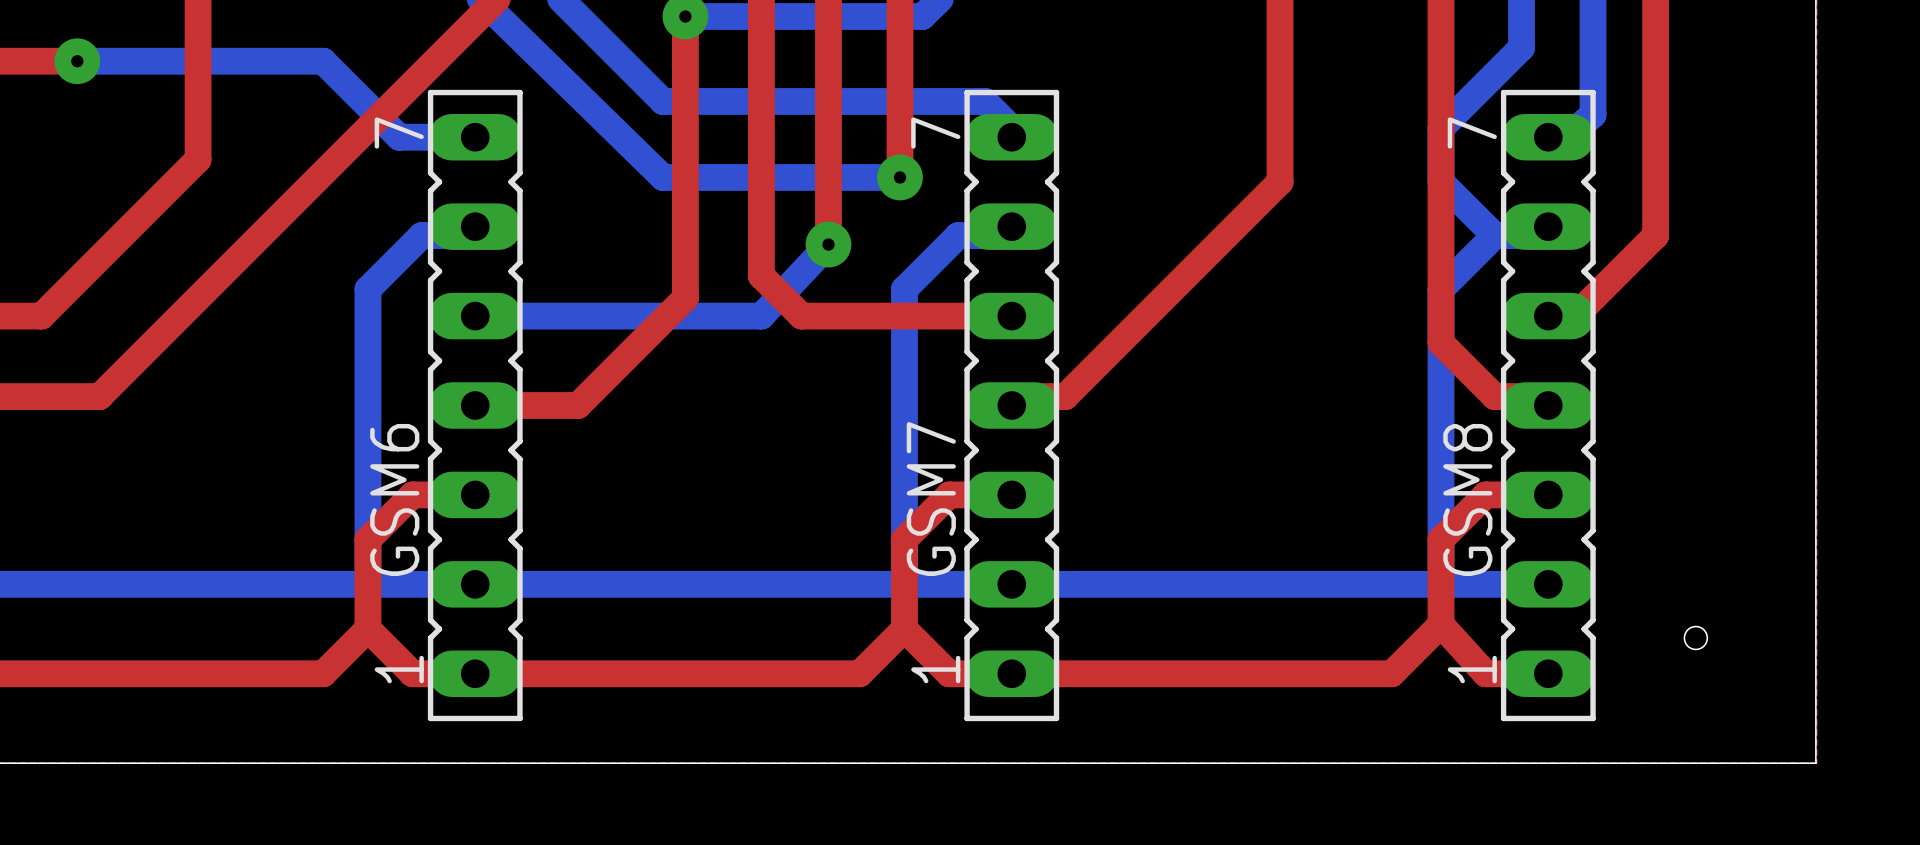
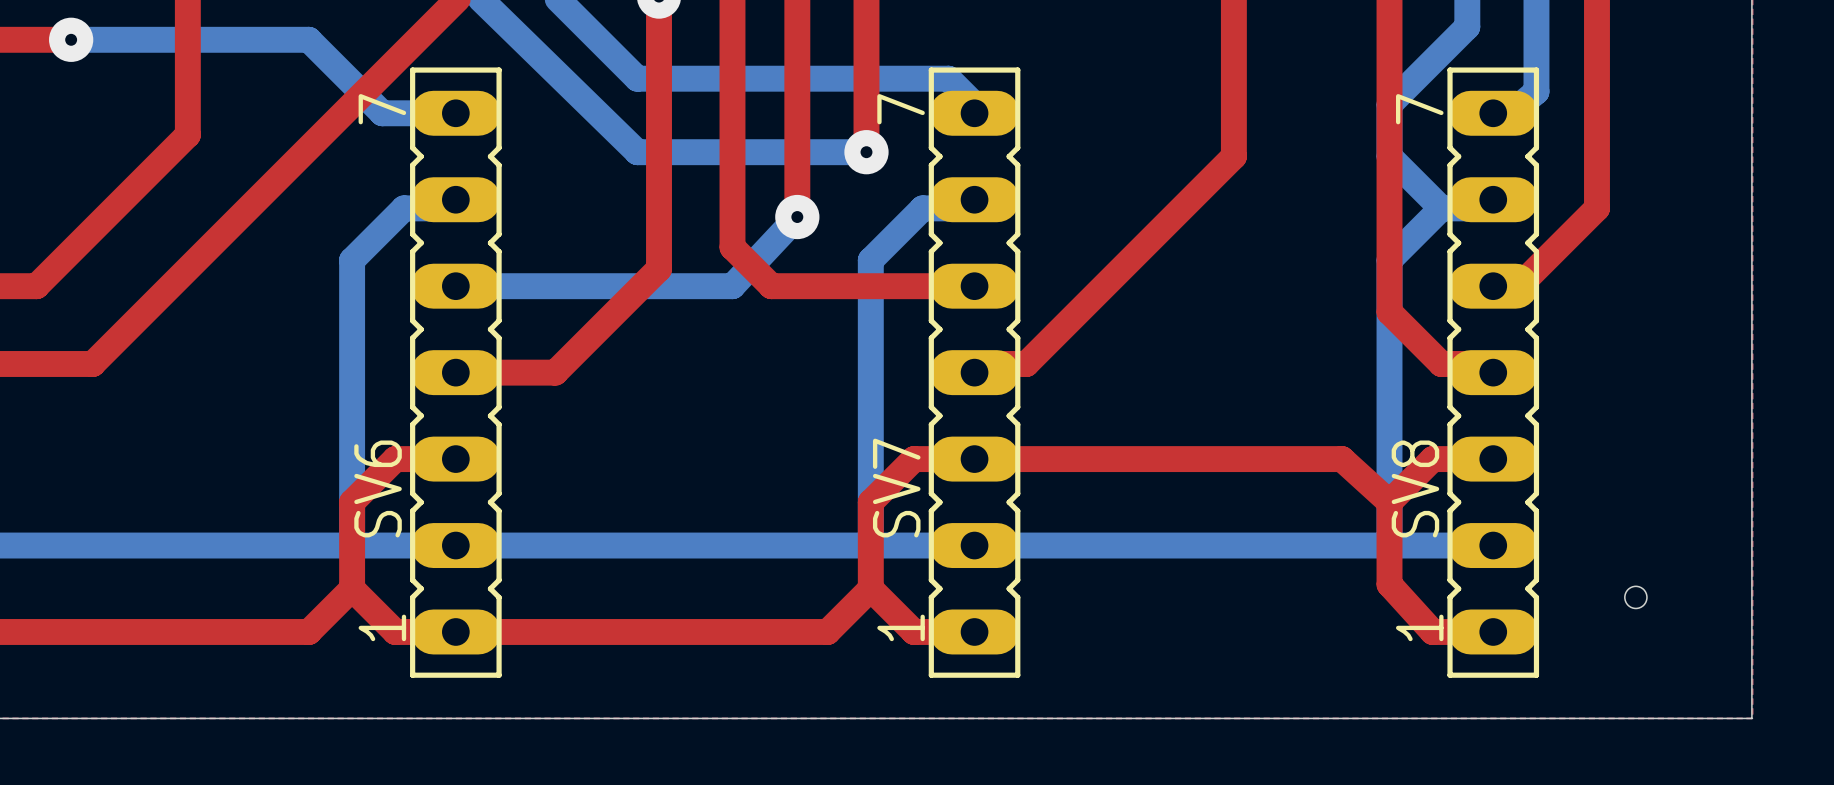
top track: none -> (974, 459) (1341, 459) (1389, 502)
GSM6 name: GSM6 (394, 499) -> SV6 (378, 488)
GSM7 name: GSM7 (931, 499) -> SV7 (896, 488)
GSM8 name: GSM8 (1467, 499) -> SV8 (1415, 488)
top track: (1441, 624) (1391, 673) (1011, 673) -> none

